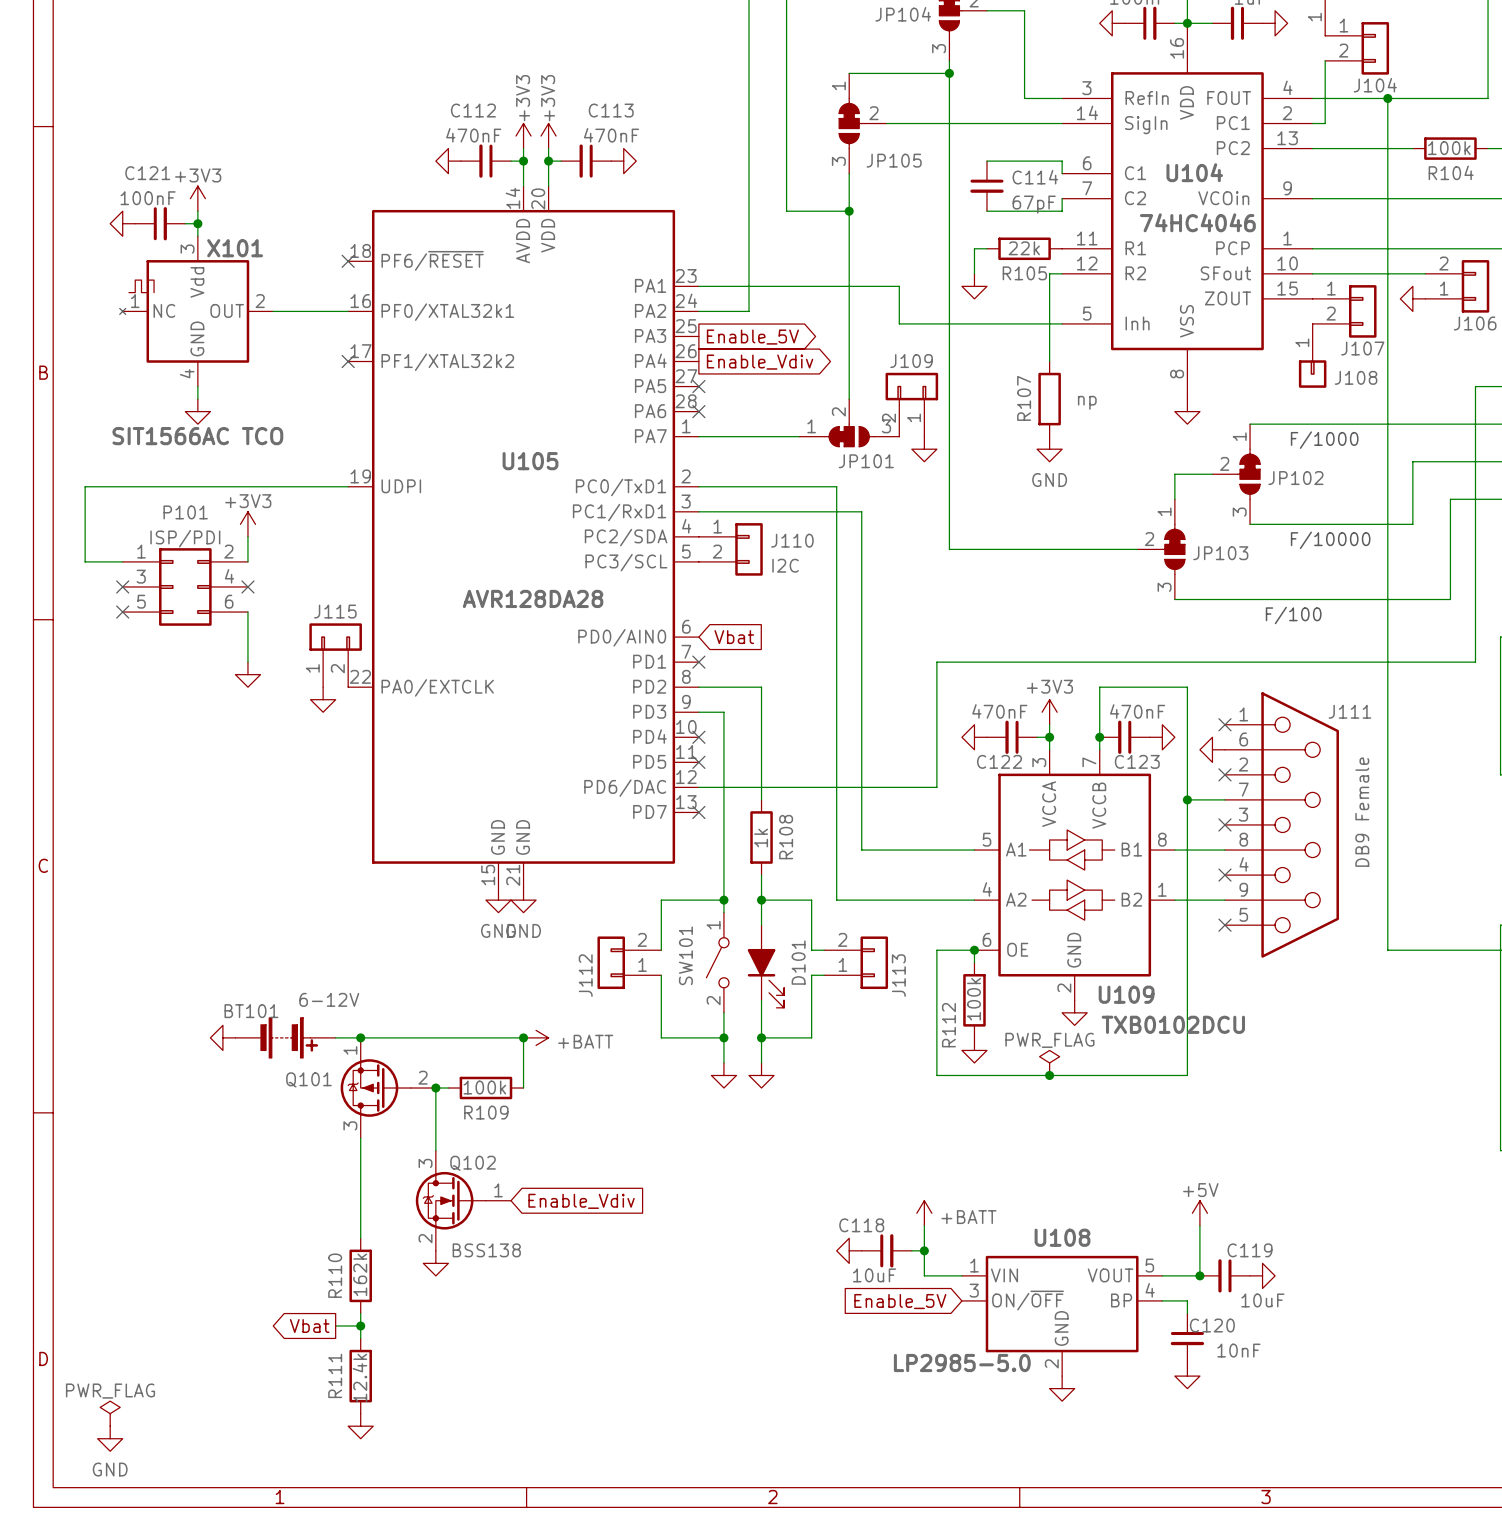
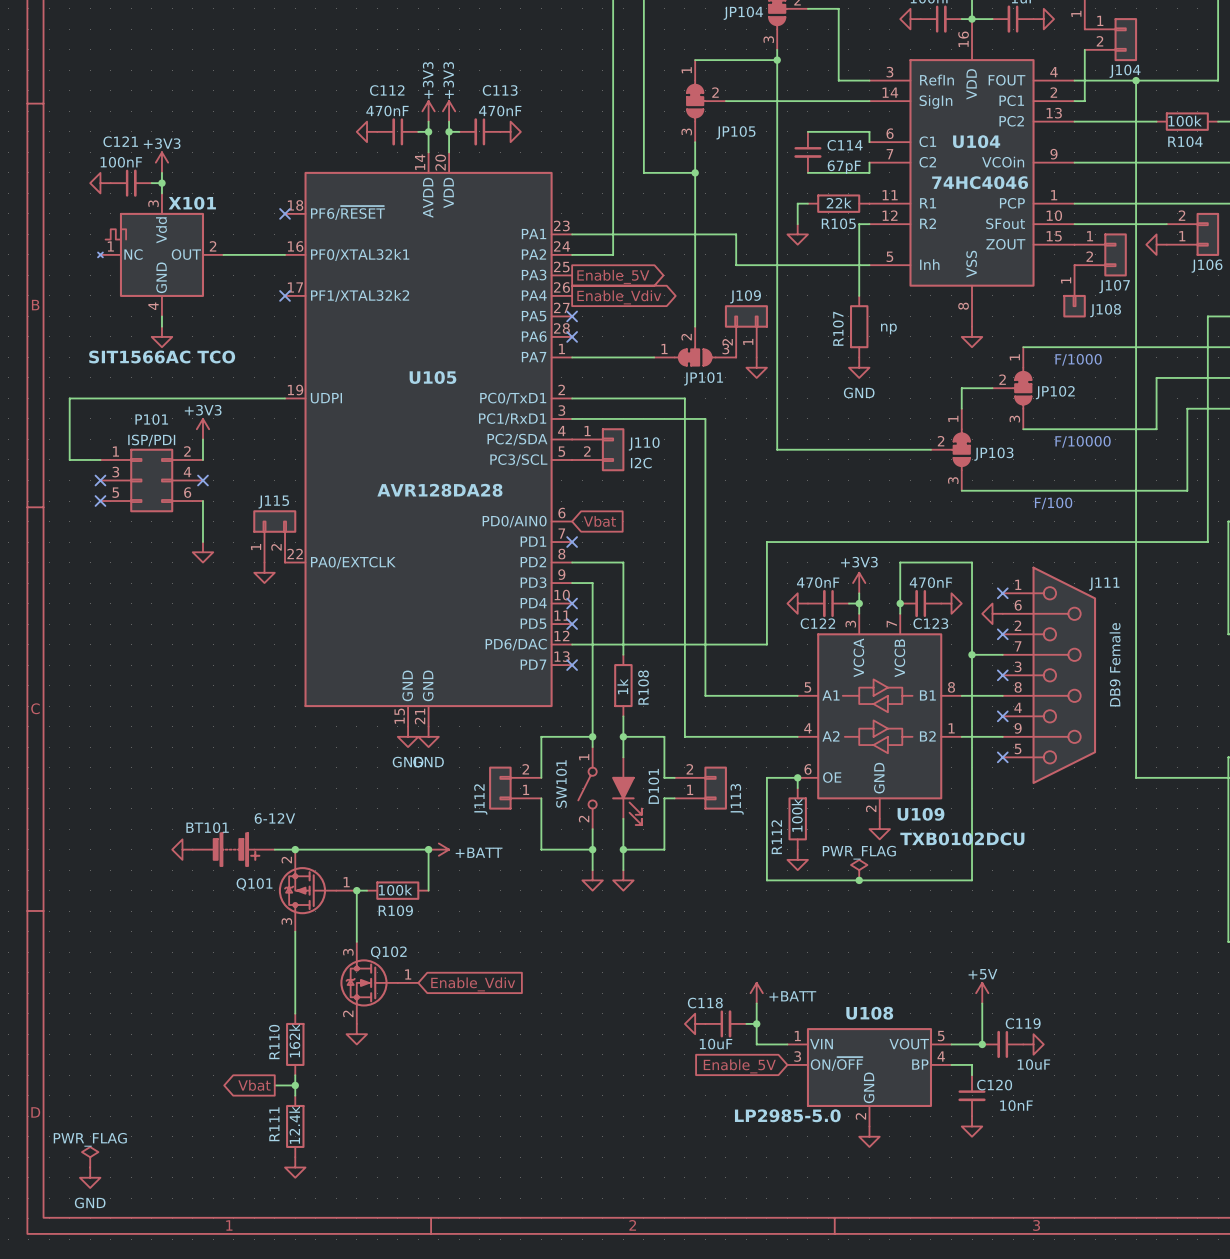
Q101 pin number: 1 (350, 1050) -> 2 (286, 860)
Q101 pin number: 2 (423, 1077) -> 1 (346, 882)
Q102 value: BSS138 (486, 1250) -> none

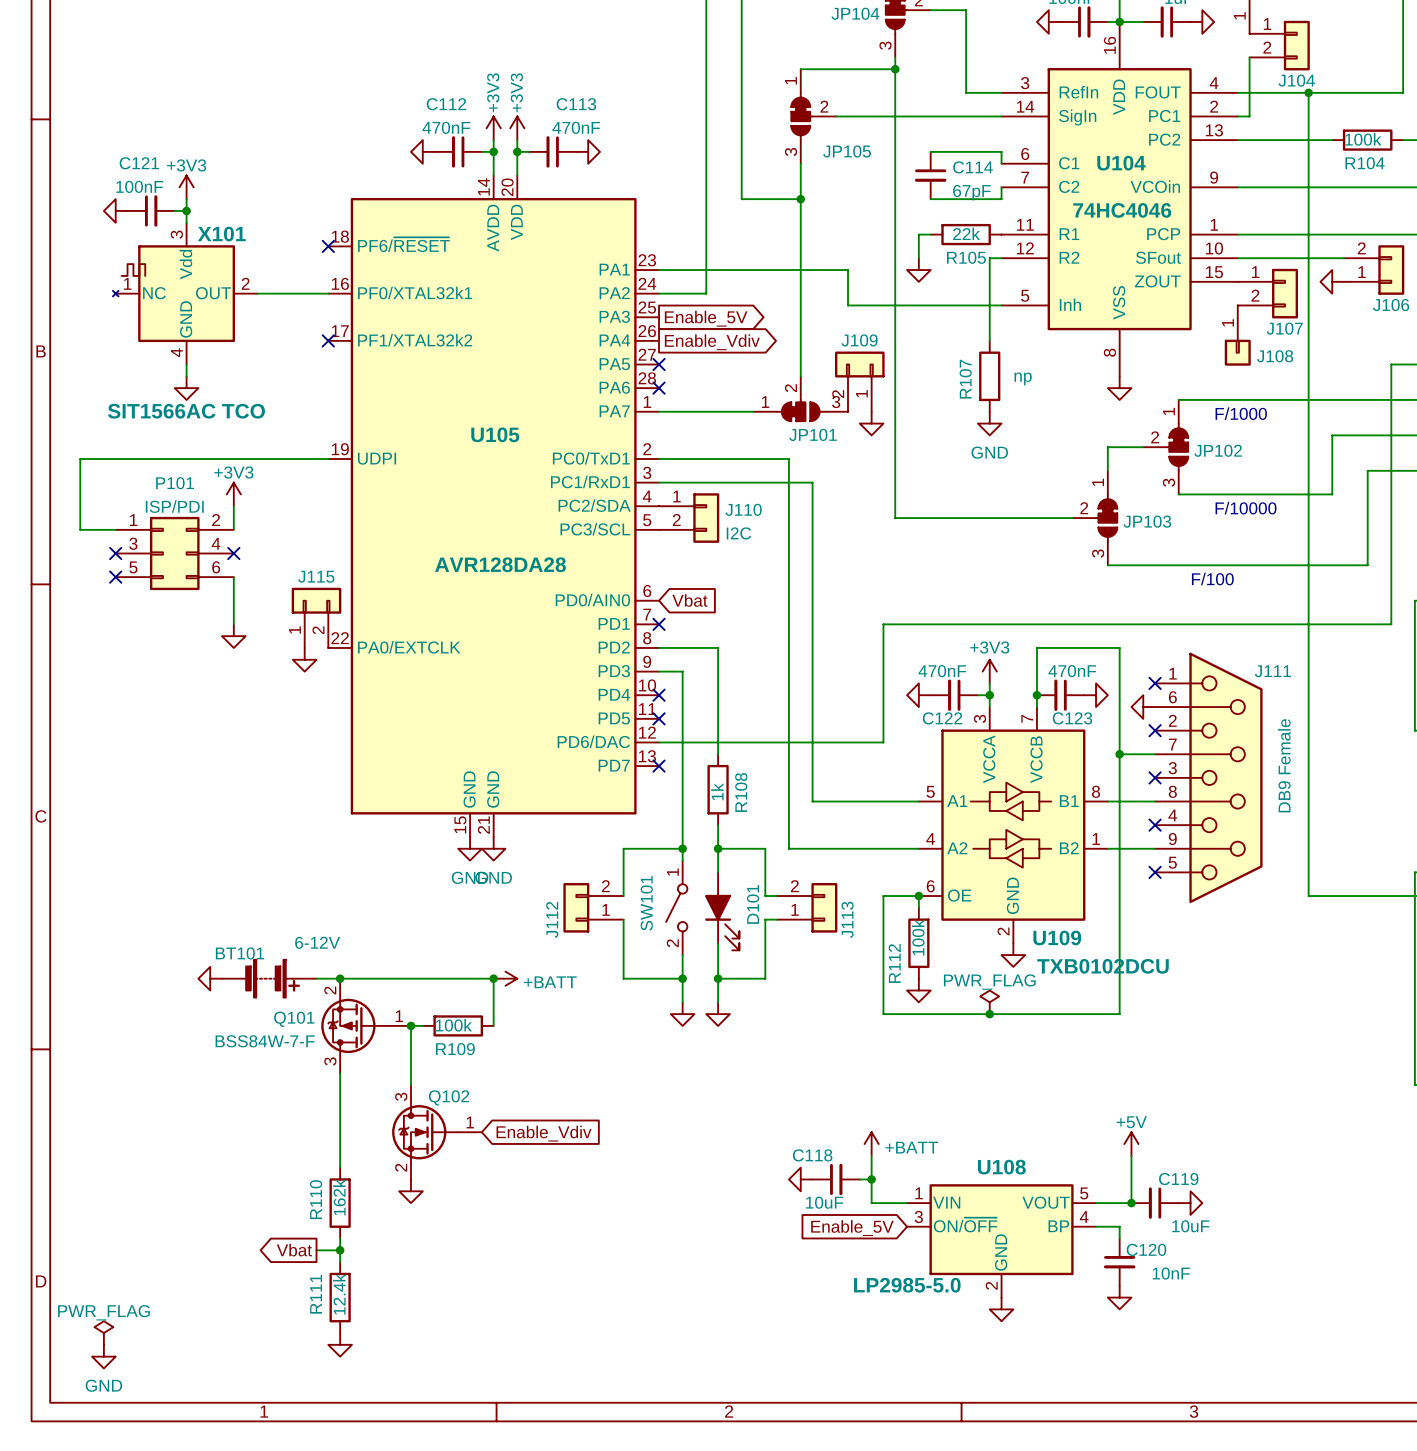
Q101 value: none -> BSS84W-7-F (265, 1041)

